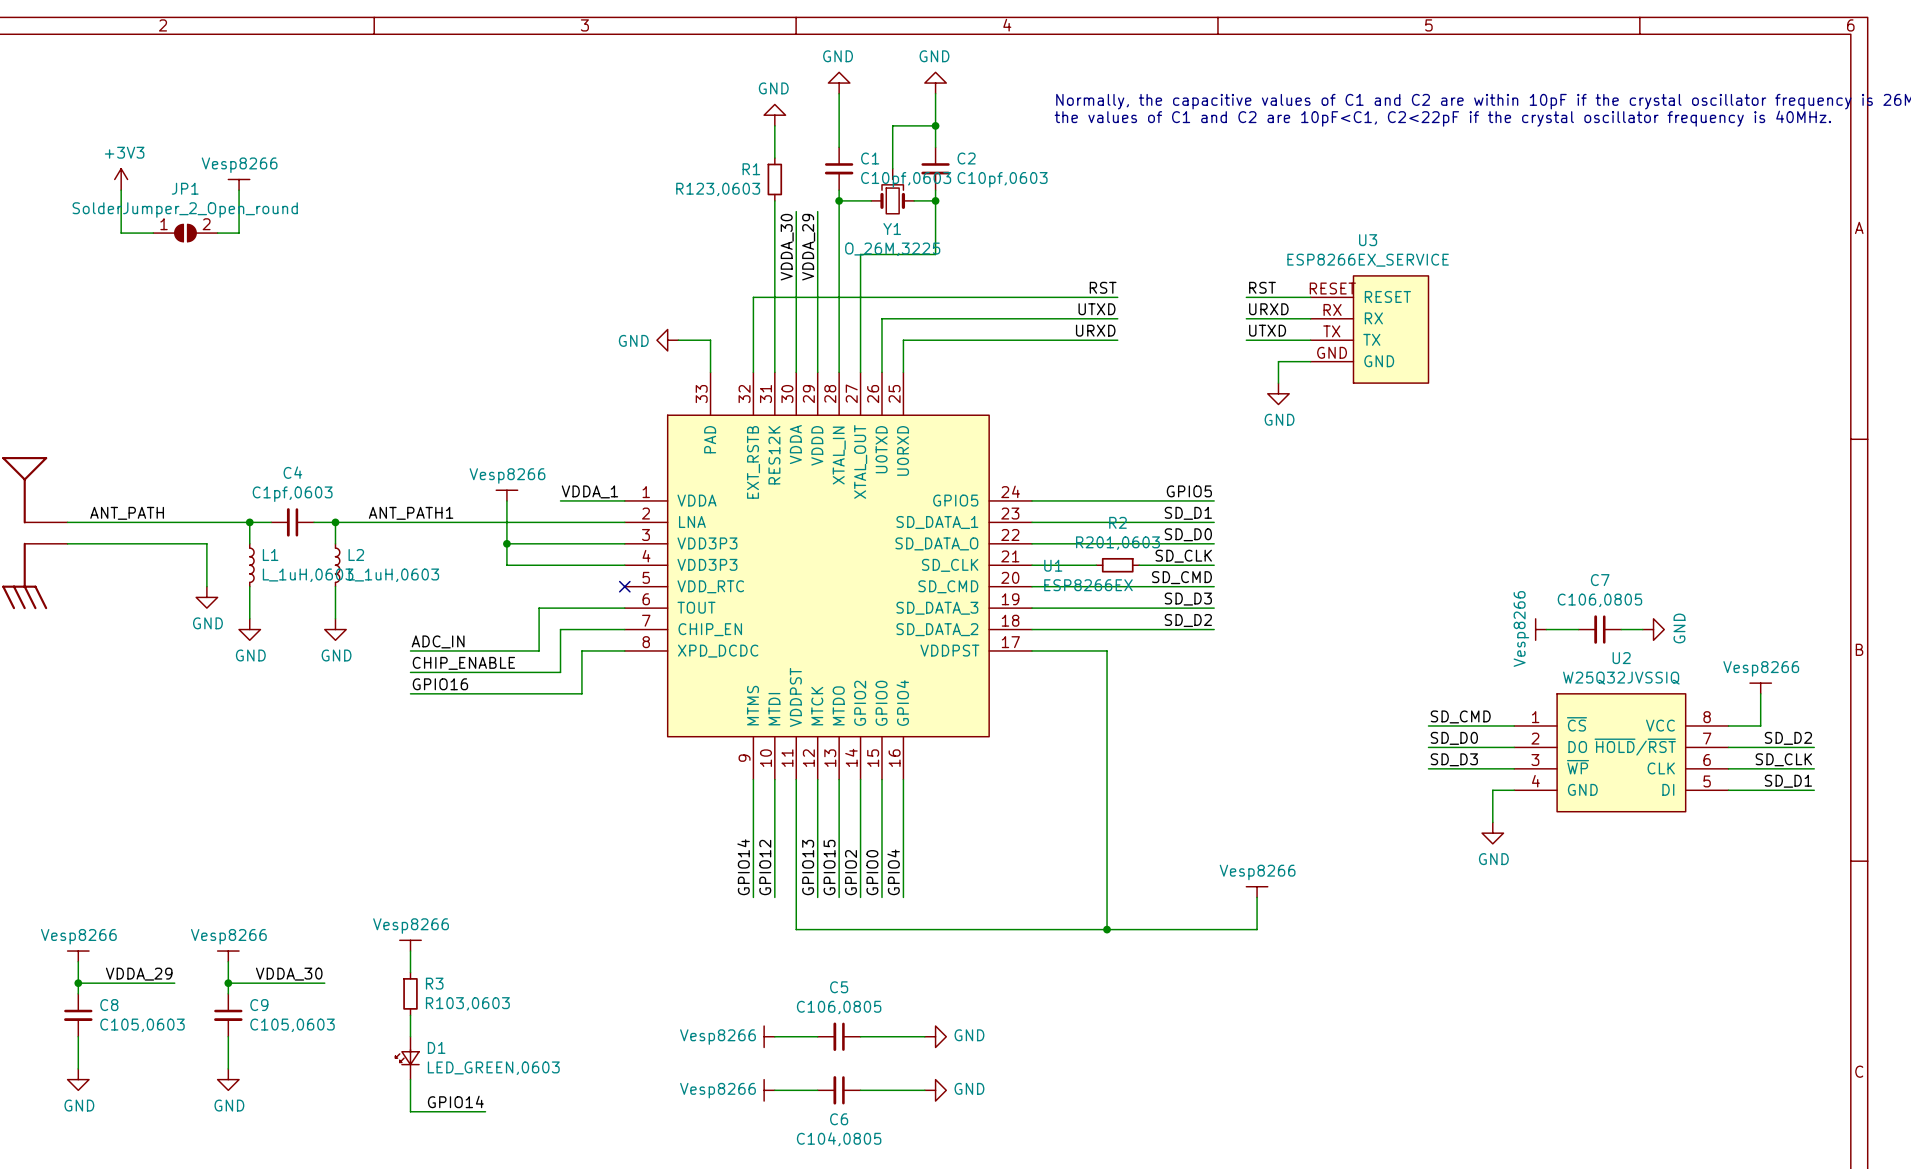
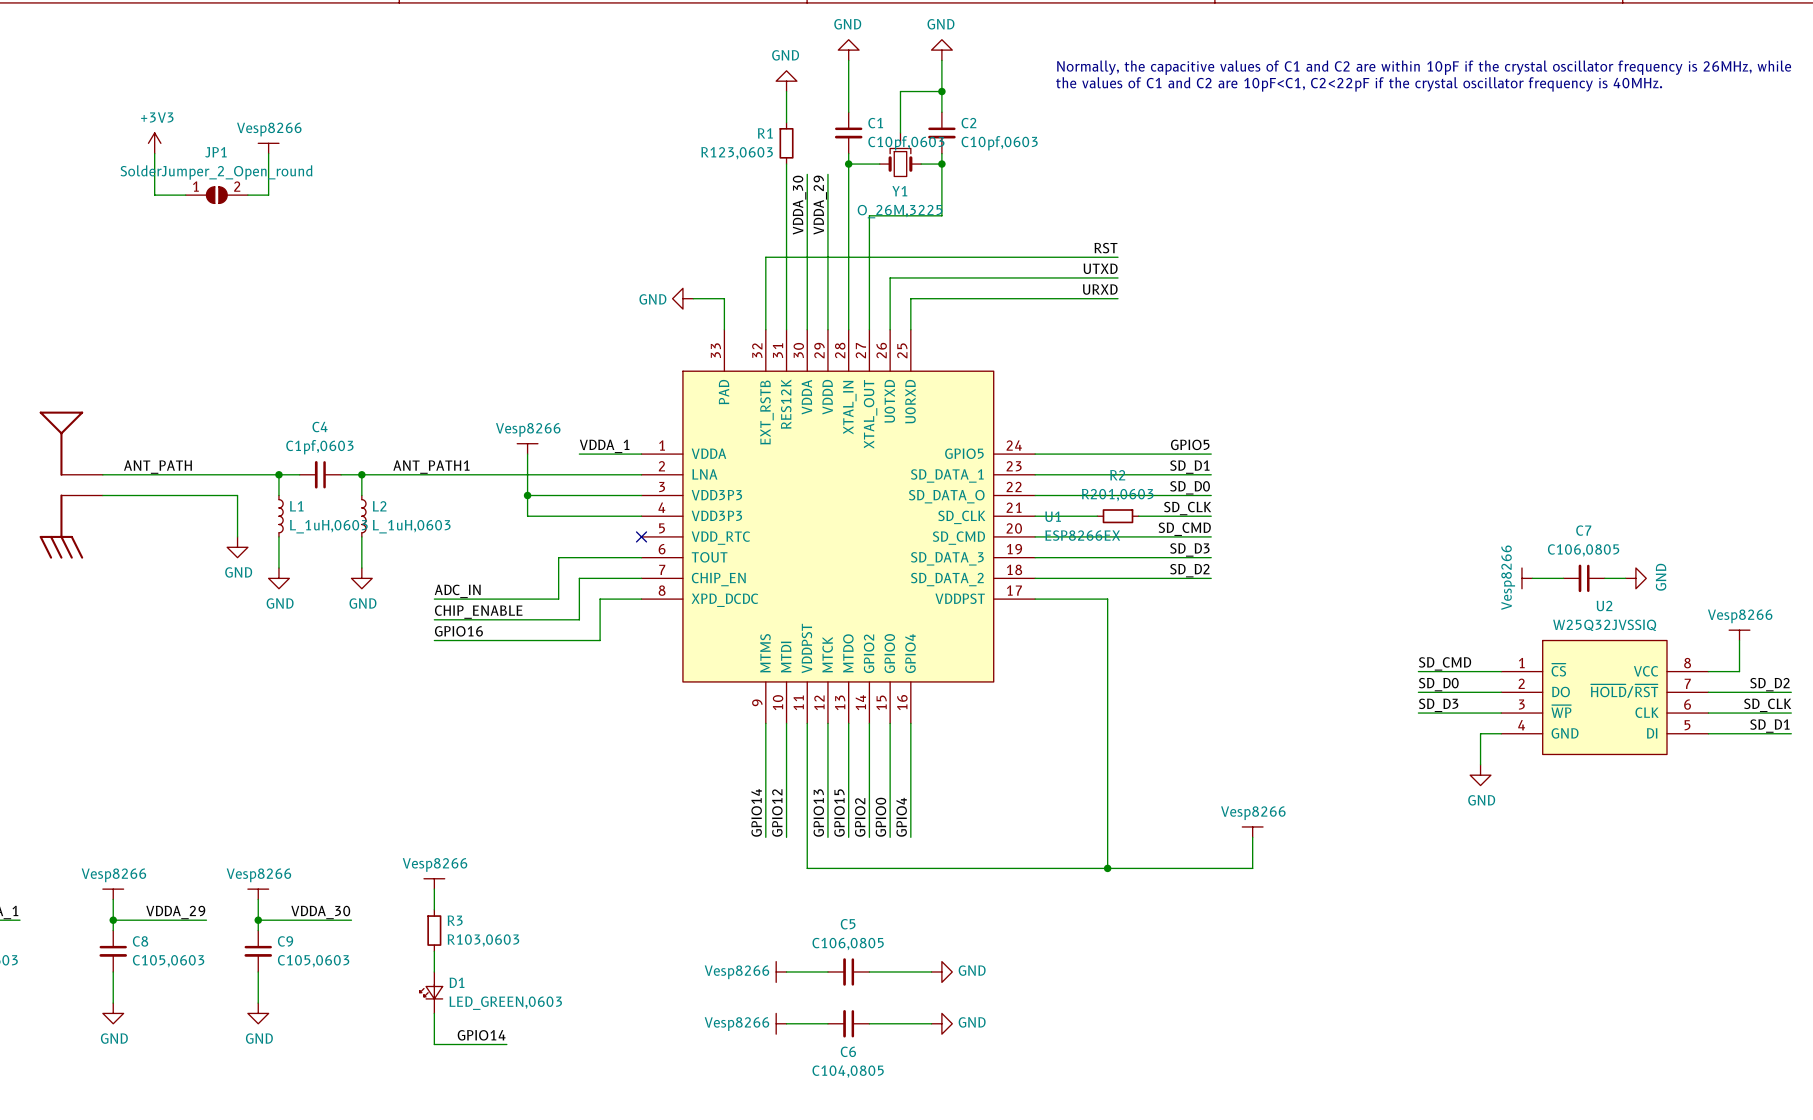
label: RST (1262, 287) -> none
wire: (1246, 297) (1310, 297) -> none
label: URXD (1268, 309) -> none
wire: (1246, 318) (1310, 318) -> none
U3: ESP8266EX_SERVICE (1369, 329) -> none
label: UTXD (1267, 330) -> none
wire: (1246, 340) (1310, 340) -> none
wire: (1310, 361) (1278, 361) (1278, 383) -> none
power symbol: GND (1278, 393) -> none

